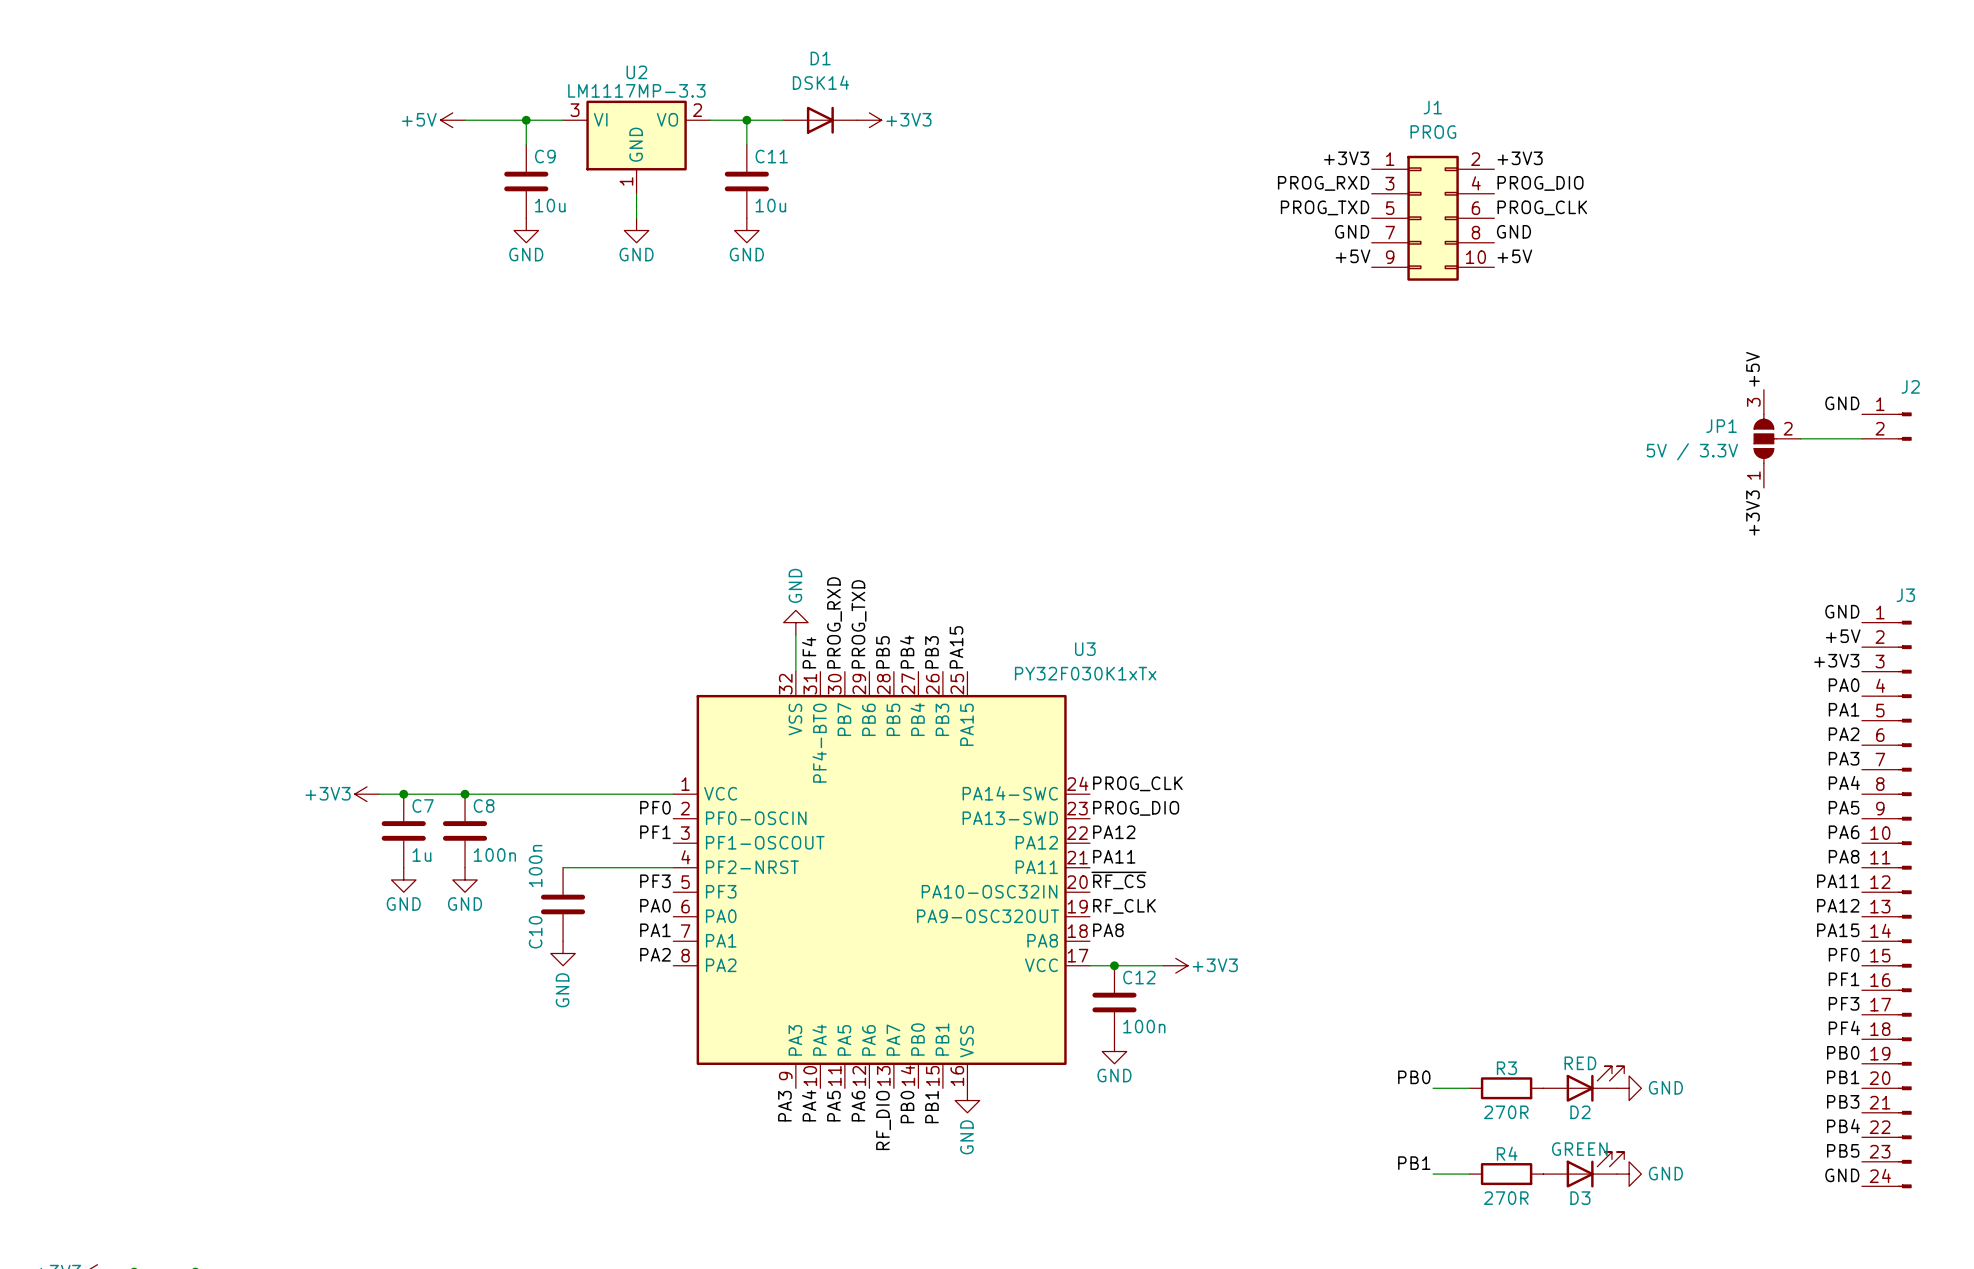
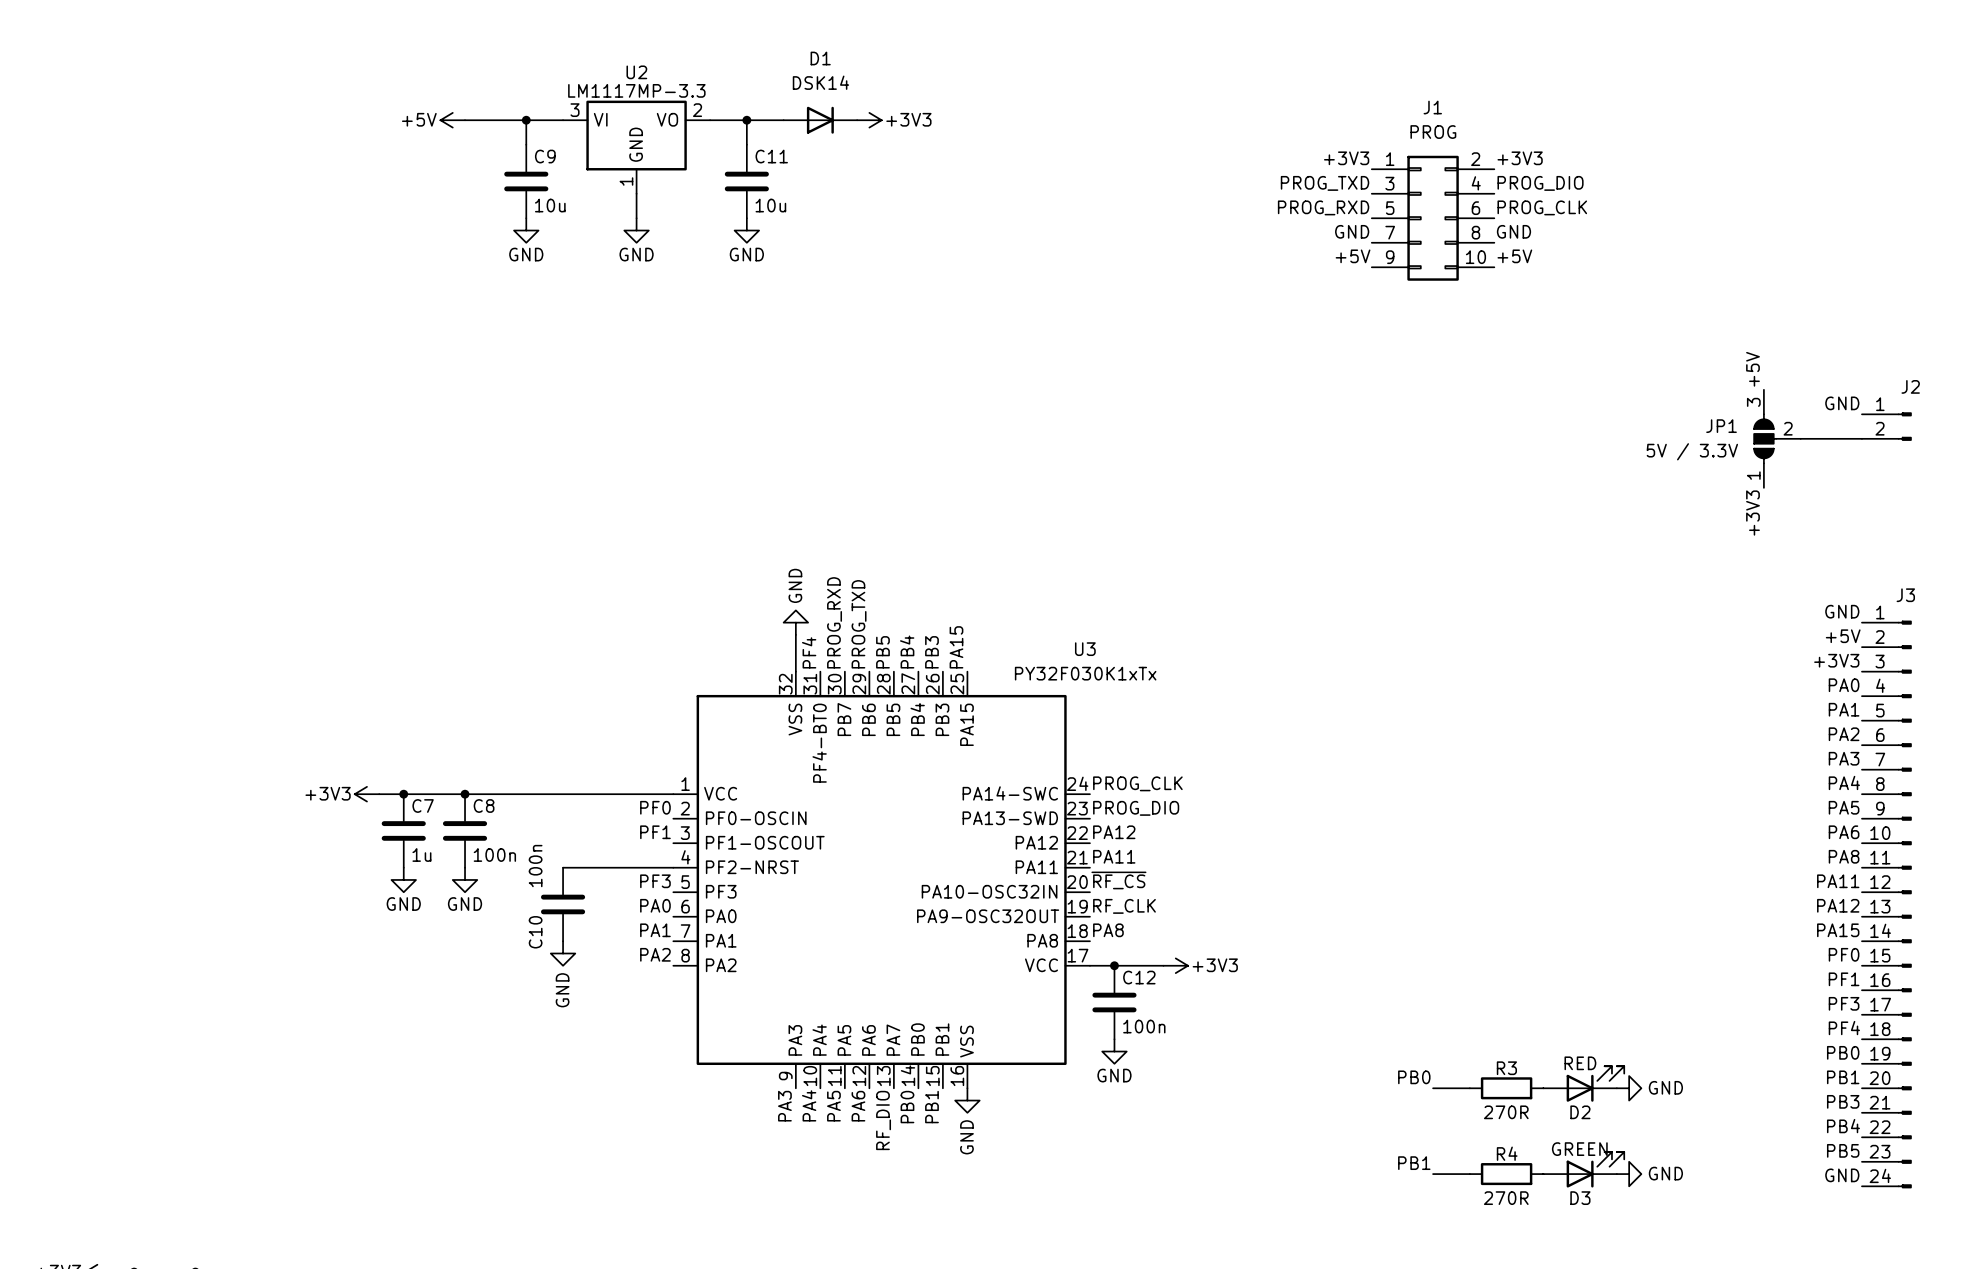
label: PROG_RXD (1323, 183) -> PROG_TXD (1325, 183)
label: PROG_TXD (1325, 207) -> PROG_RXD (1323, 207)

